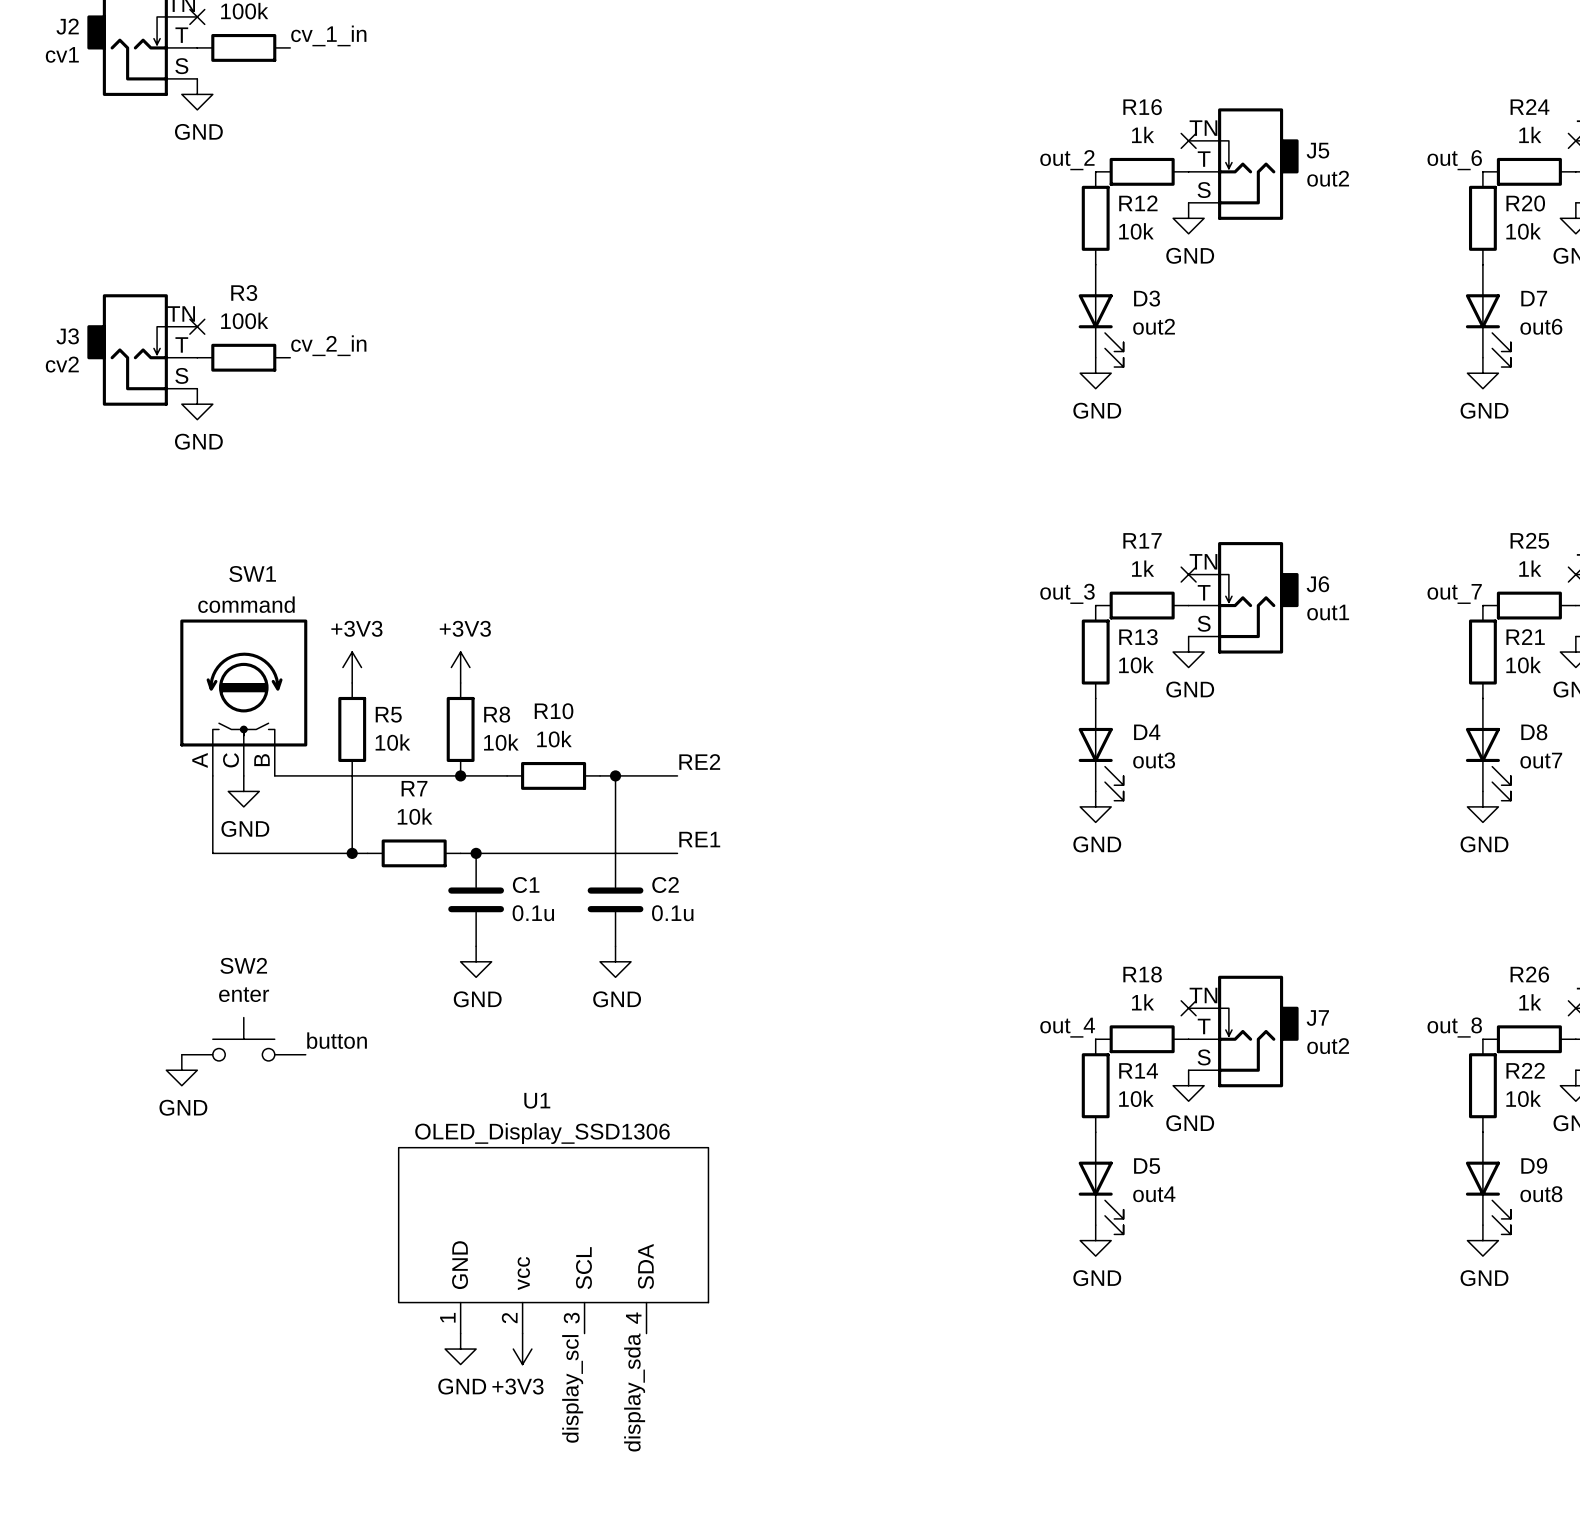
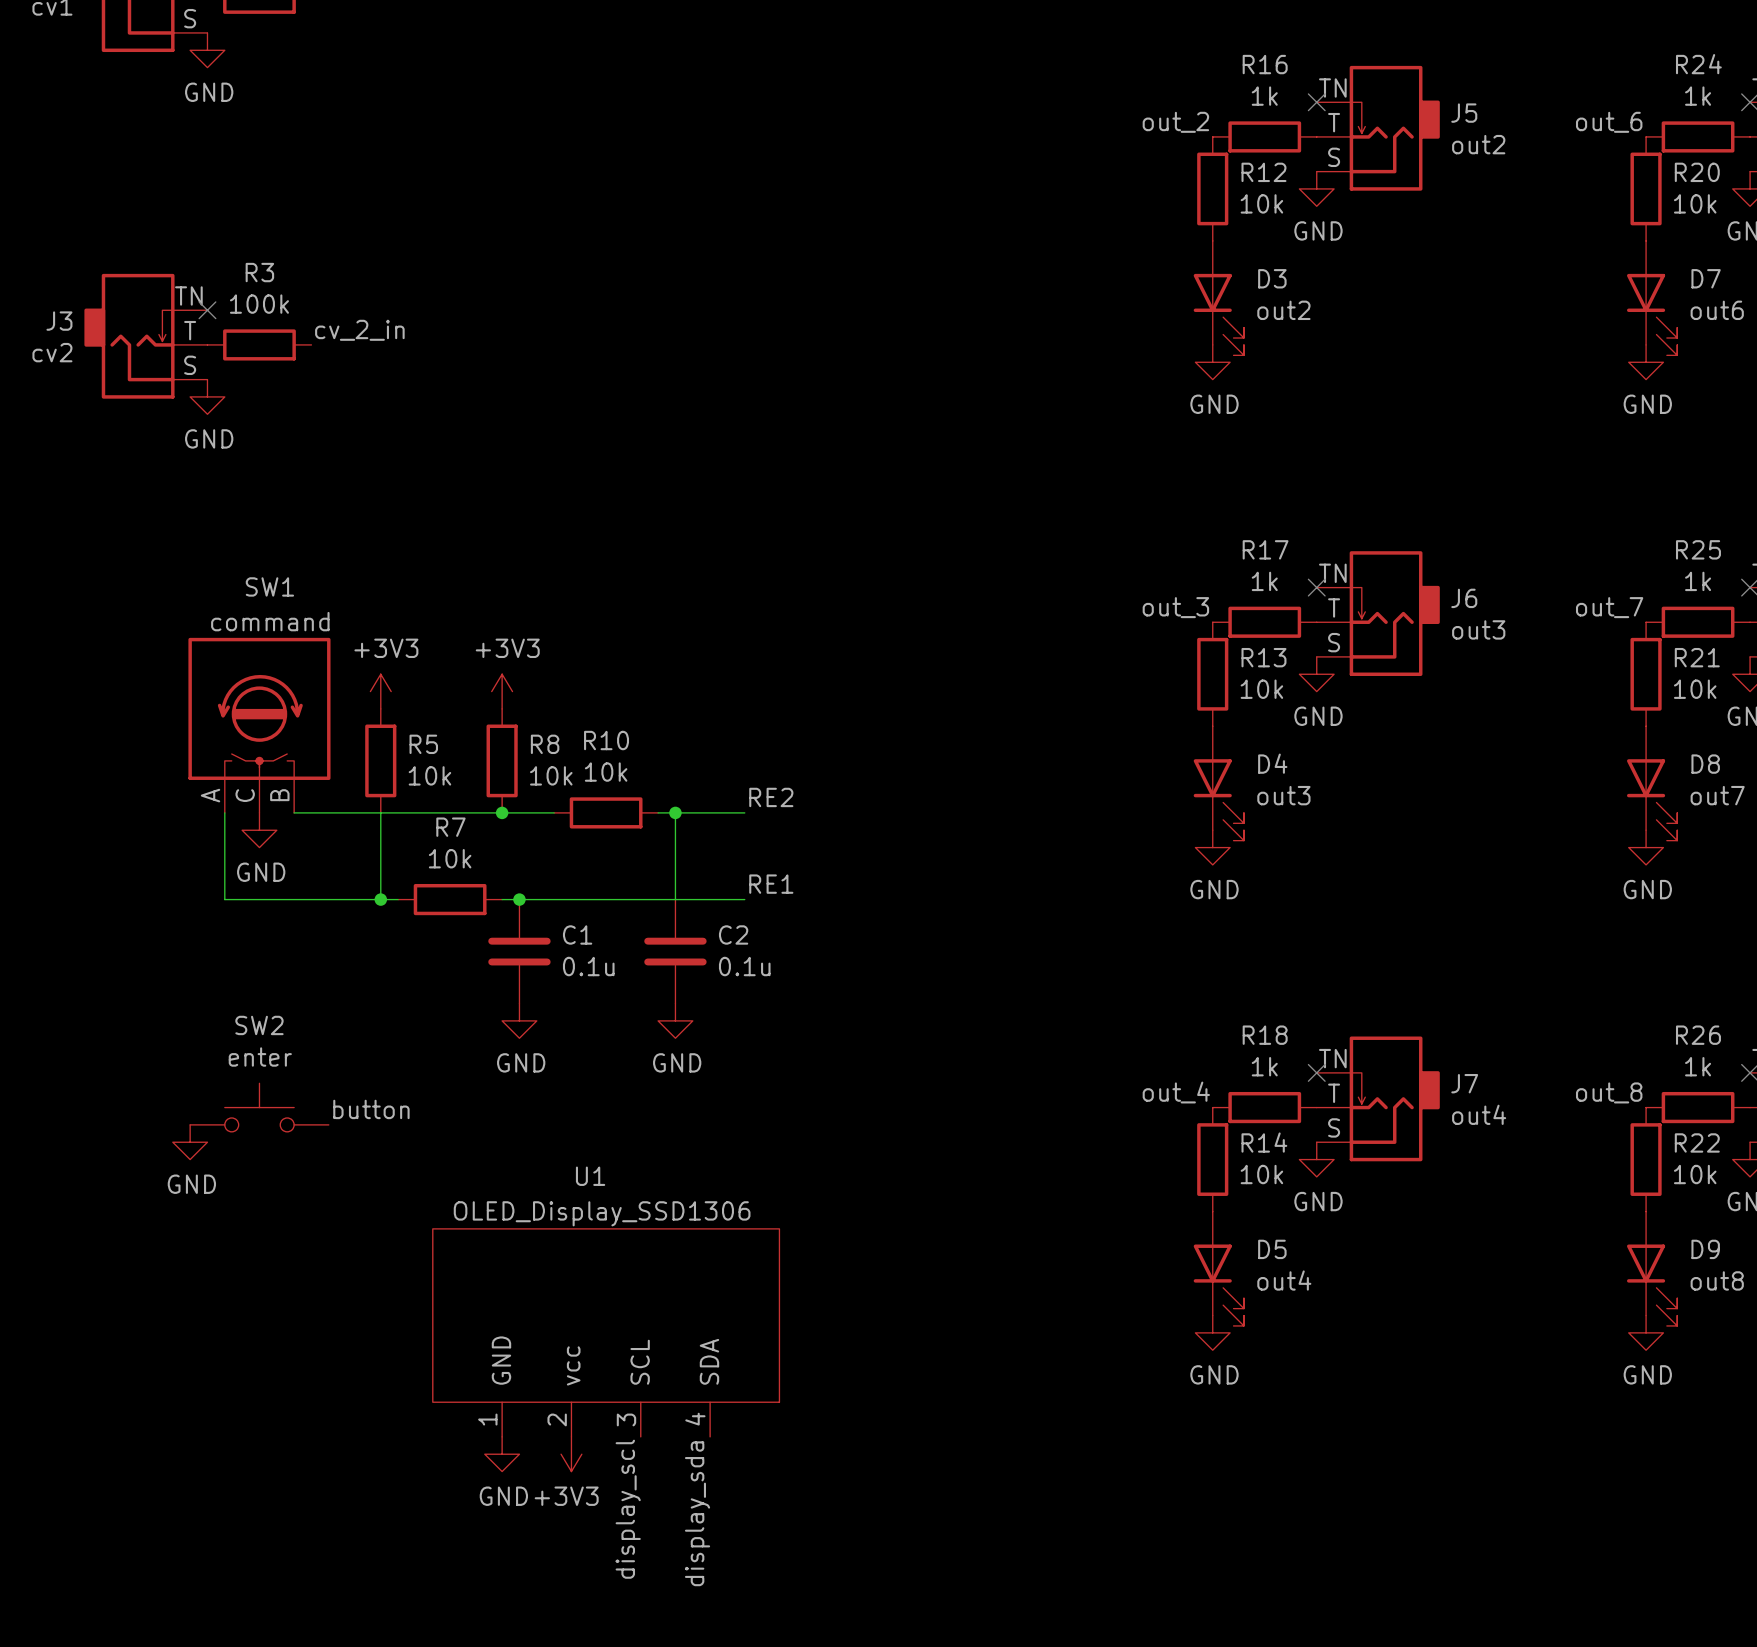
J6 value: out1 (1328, 612) -> out3 (1478, 629)
J7 value: out2 (1328, 1046) -> out4 (1479, 1114)

